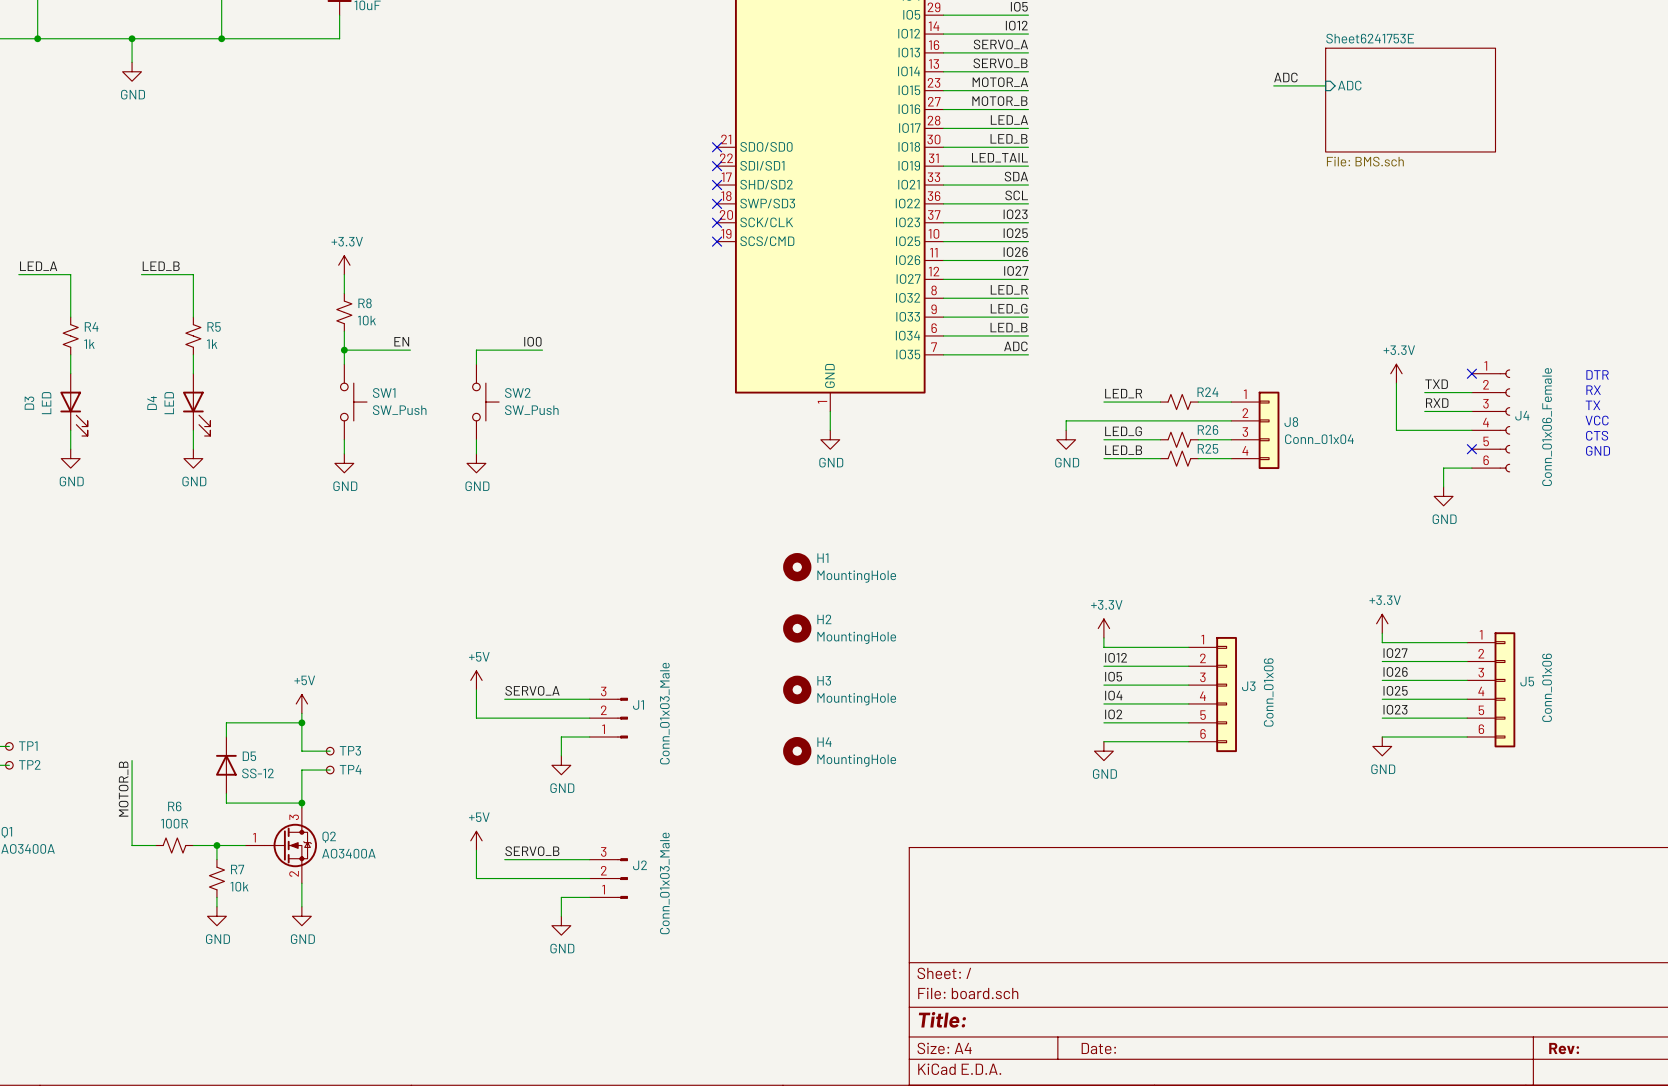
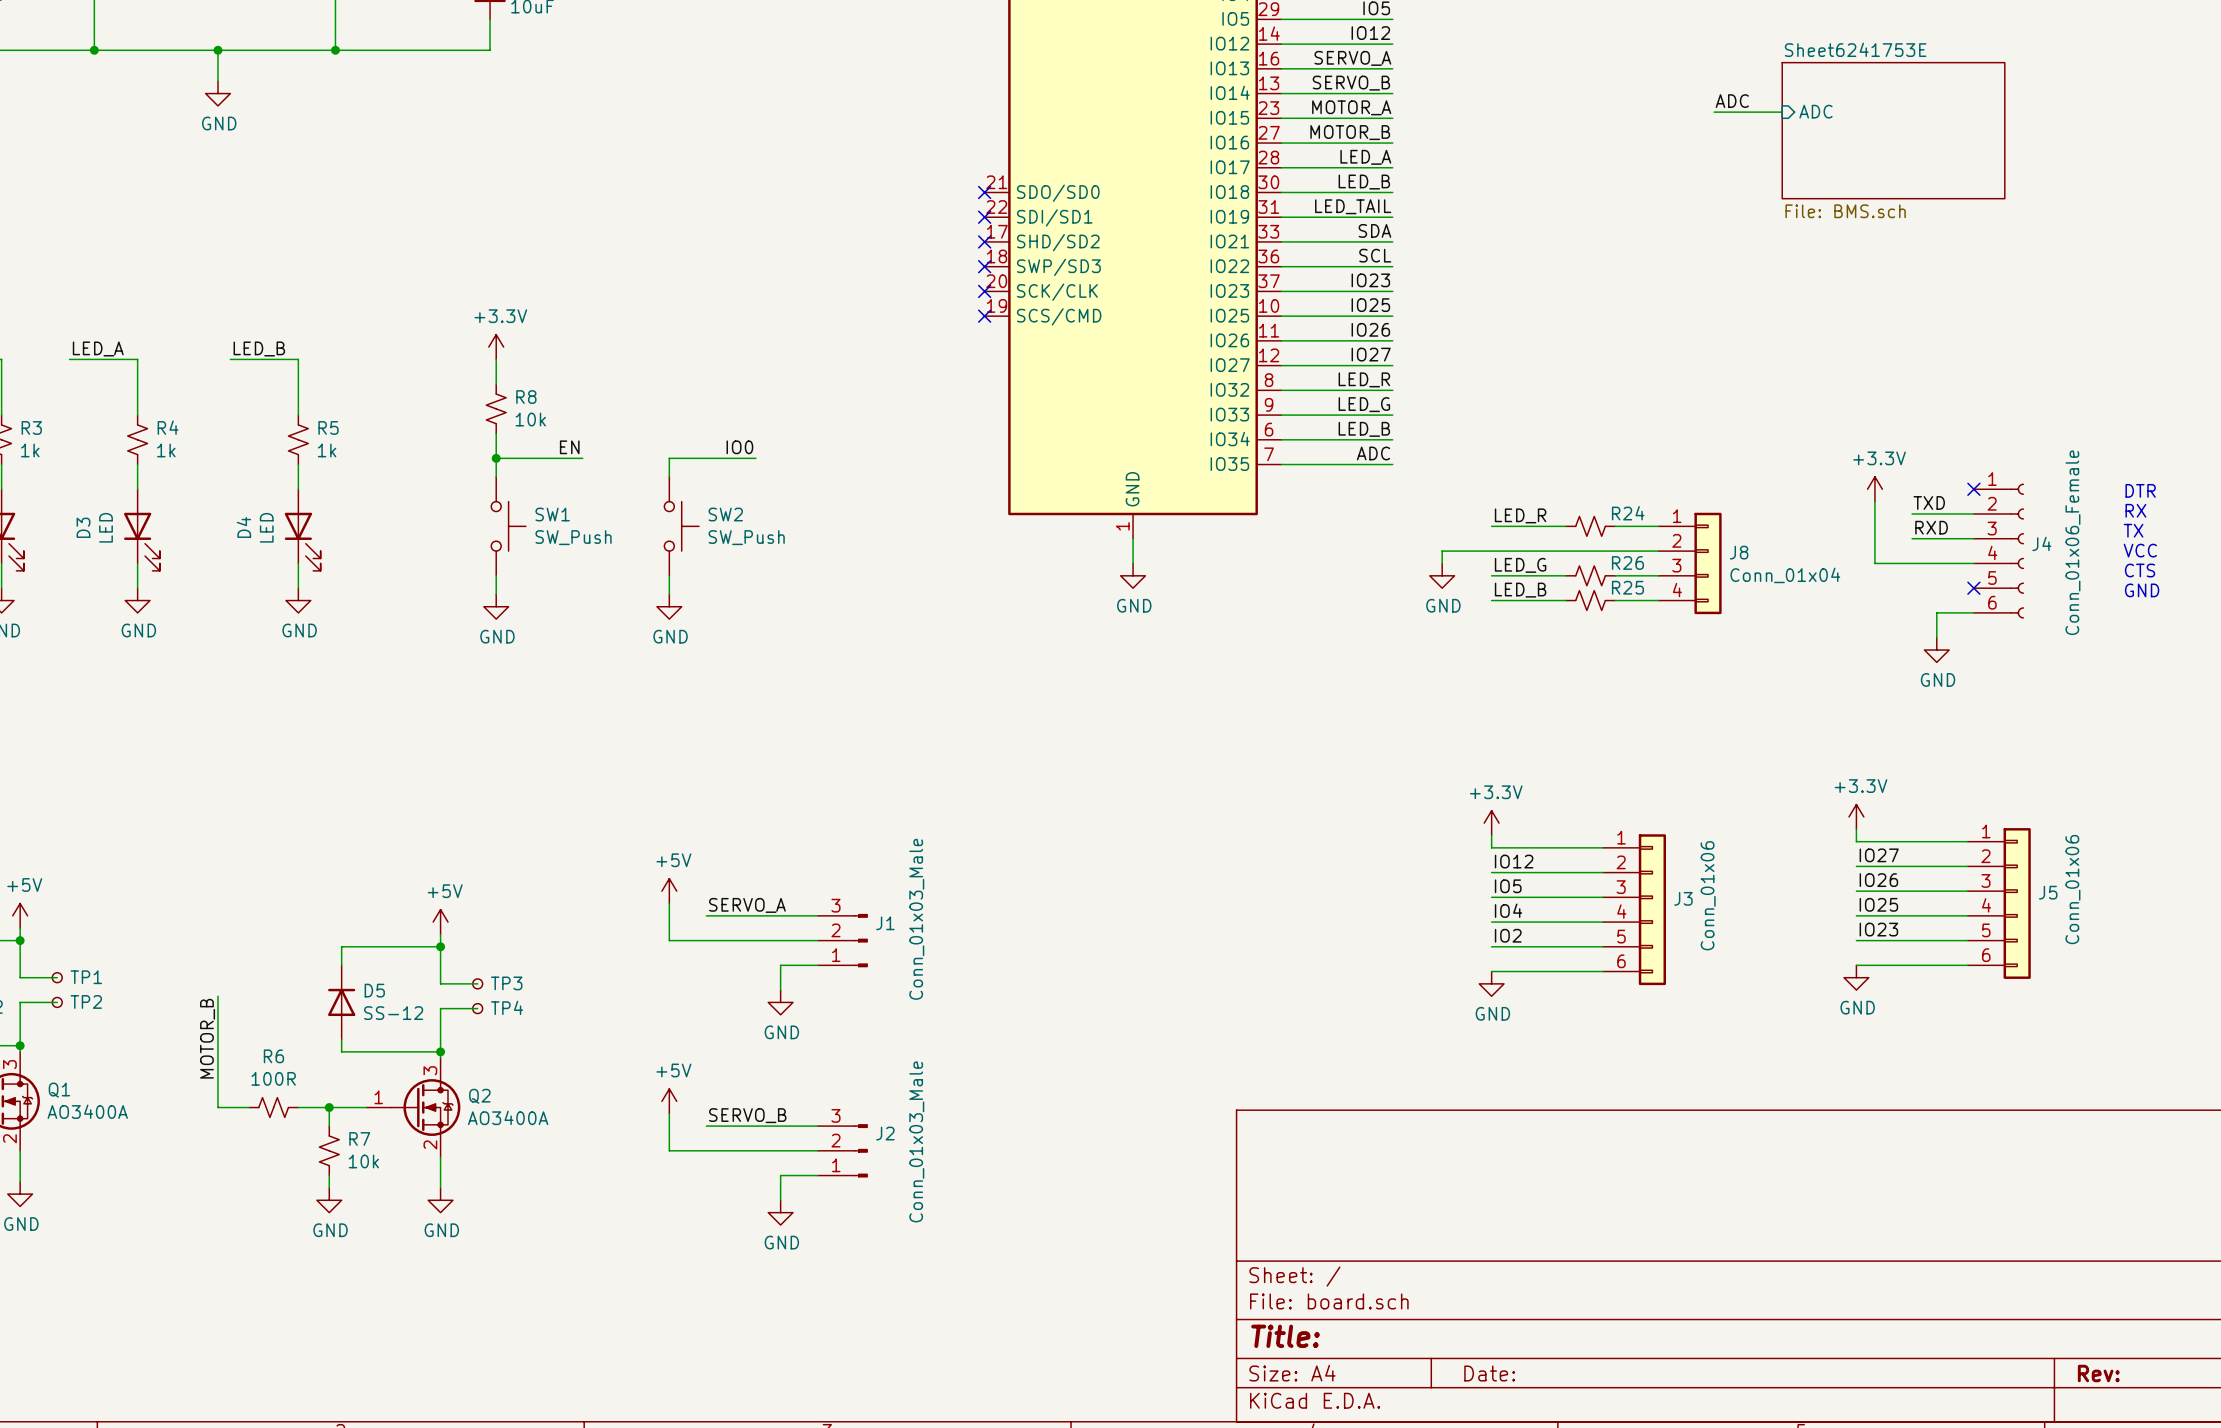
H1: MountingHole (797, 567) -> none
H2: MountingHole (797, 628) -> none
H3: MountingHole (797, 689) -> none
H4: MountingHole (797, 751) -> none

